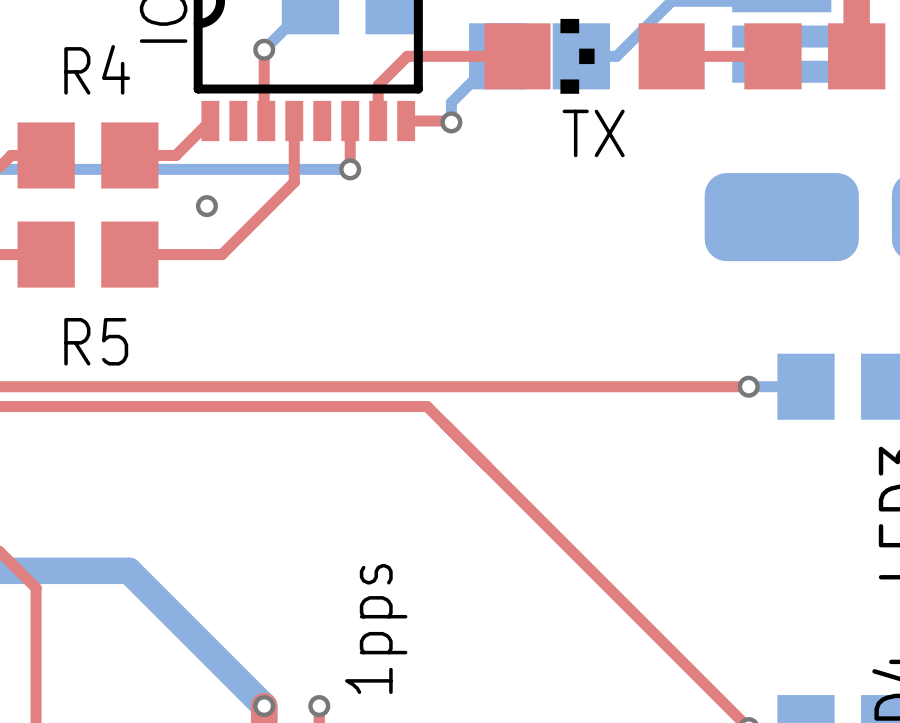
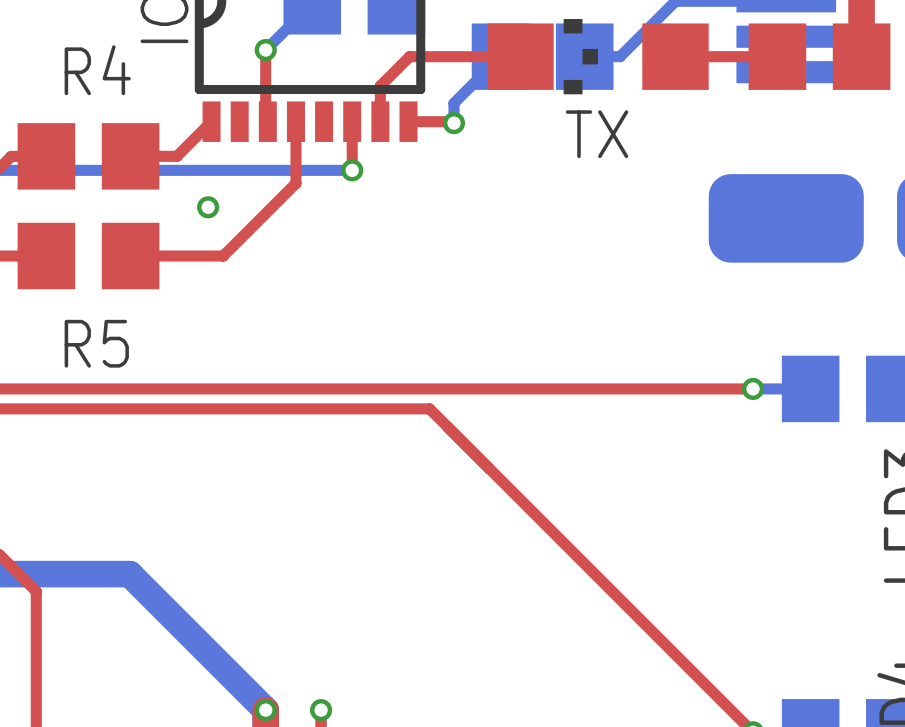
part text: 1pps (376, 628) -> none

